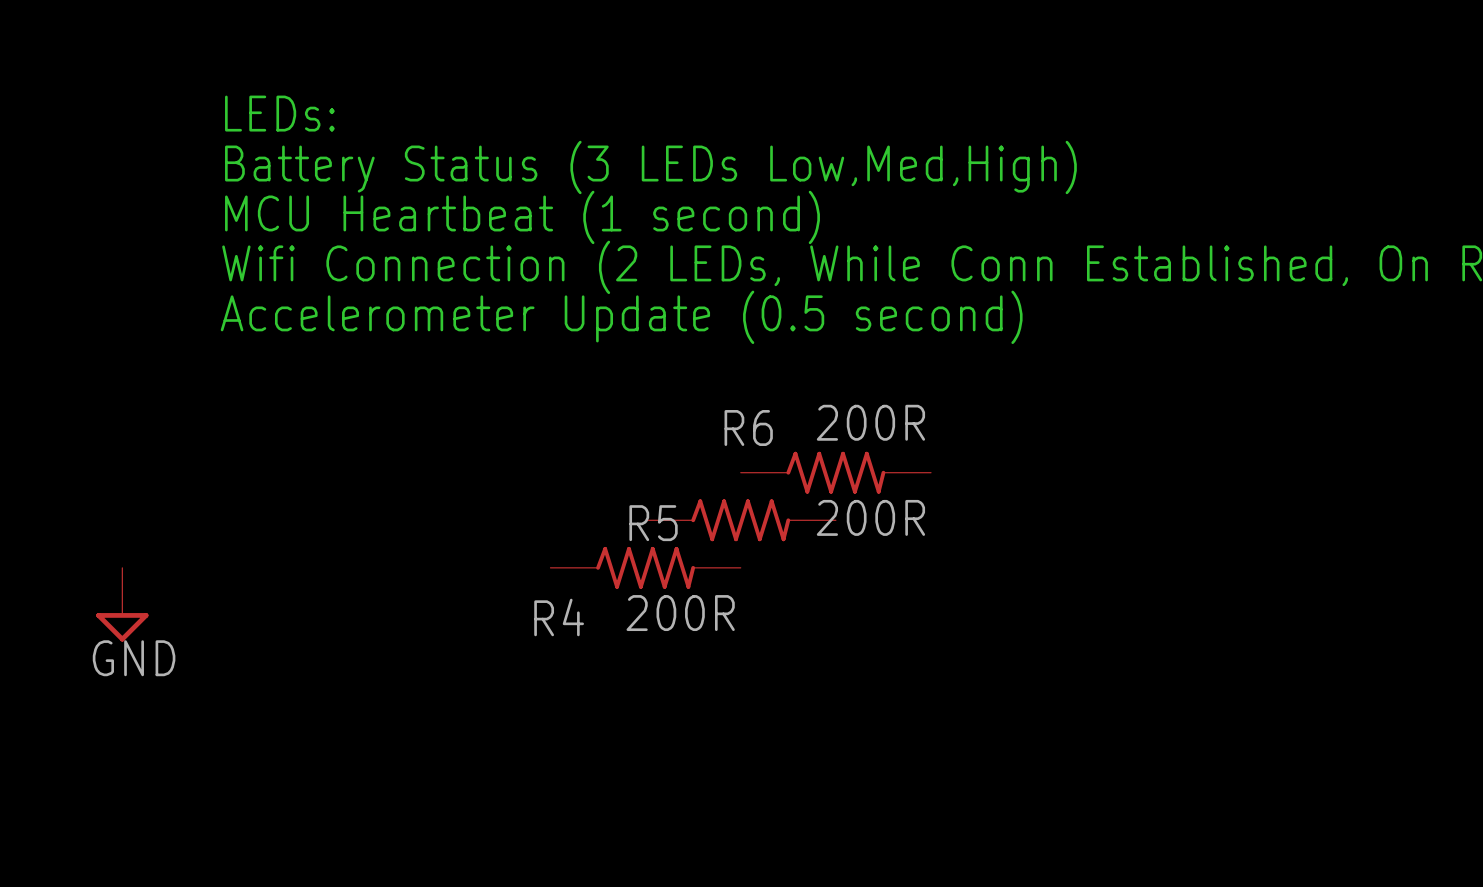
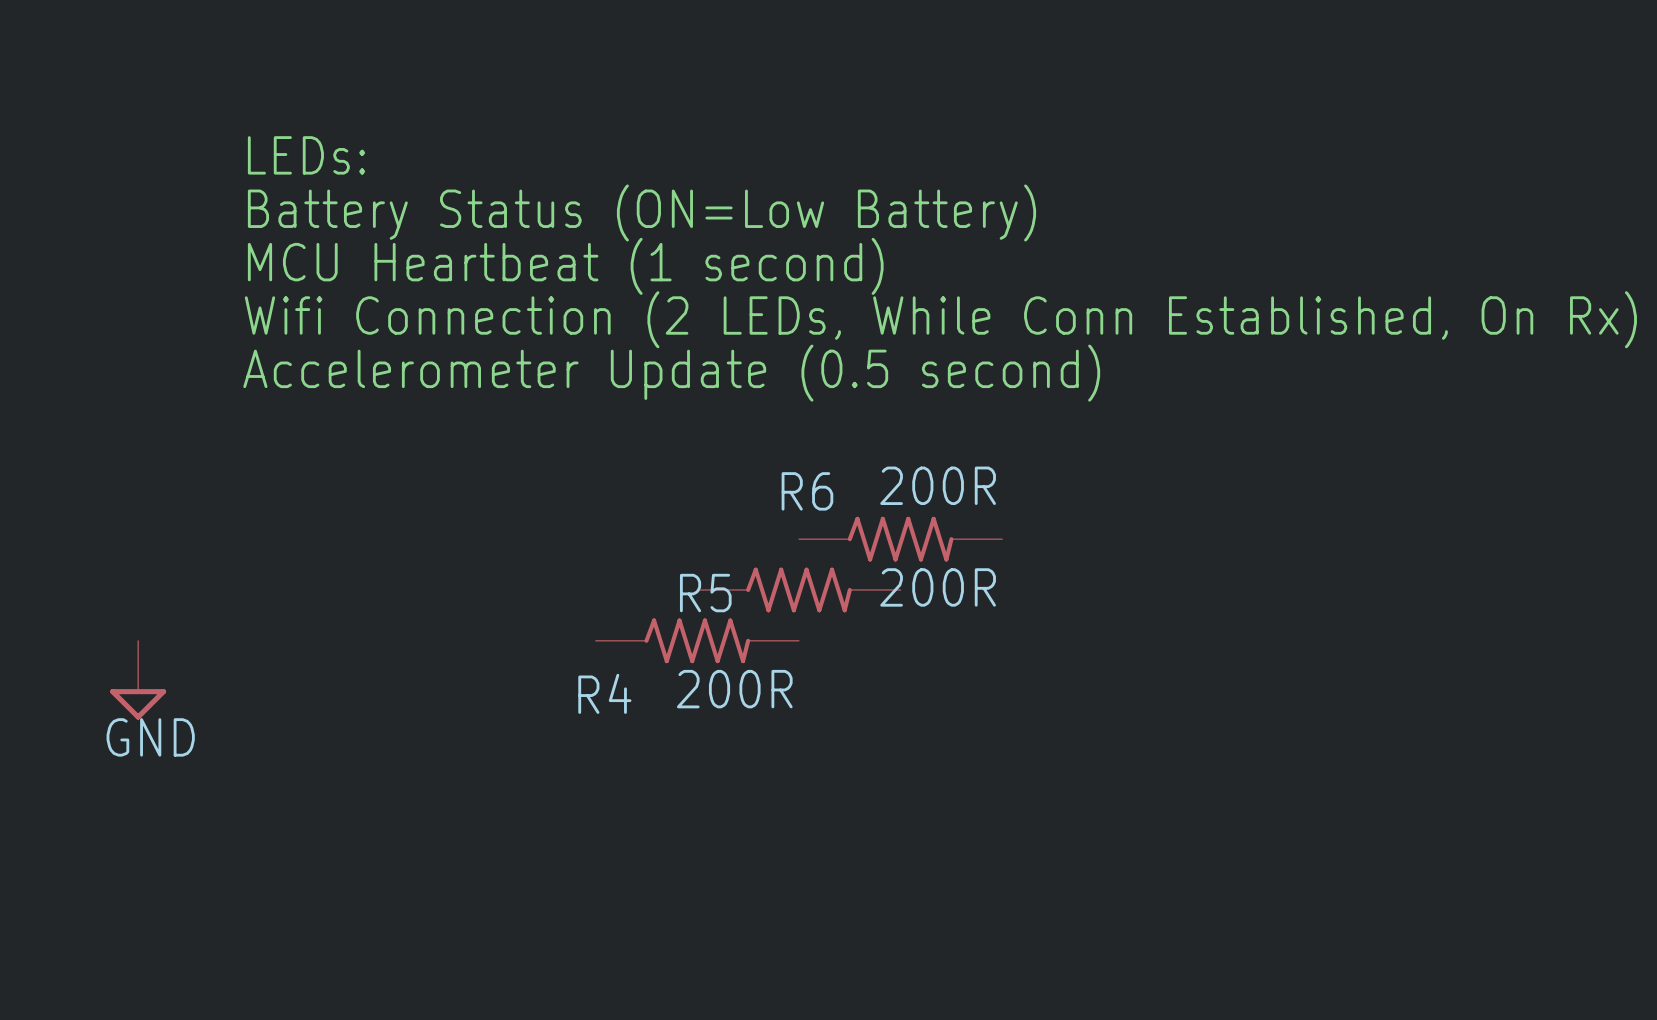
text: Battery Status (3 LEDs Low,Med,High) (650, 167) -> Battery Status (ON=Low Battery) (641, 212)

